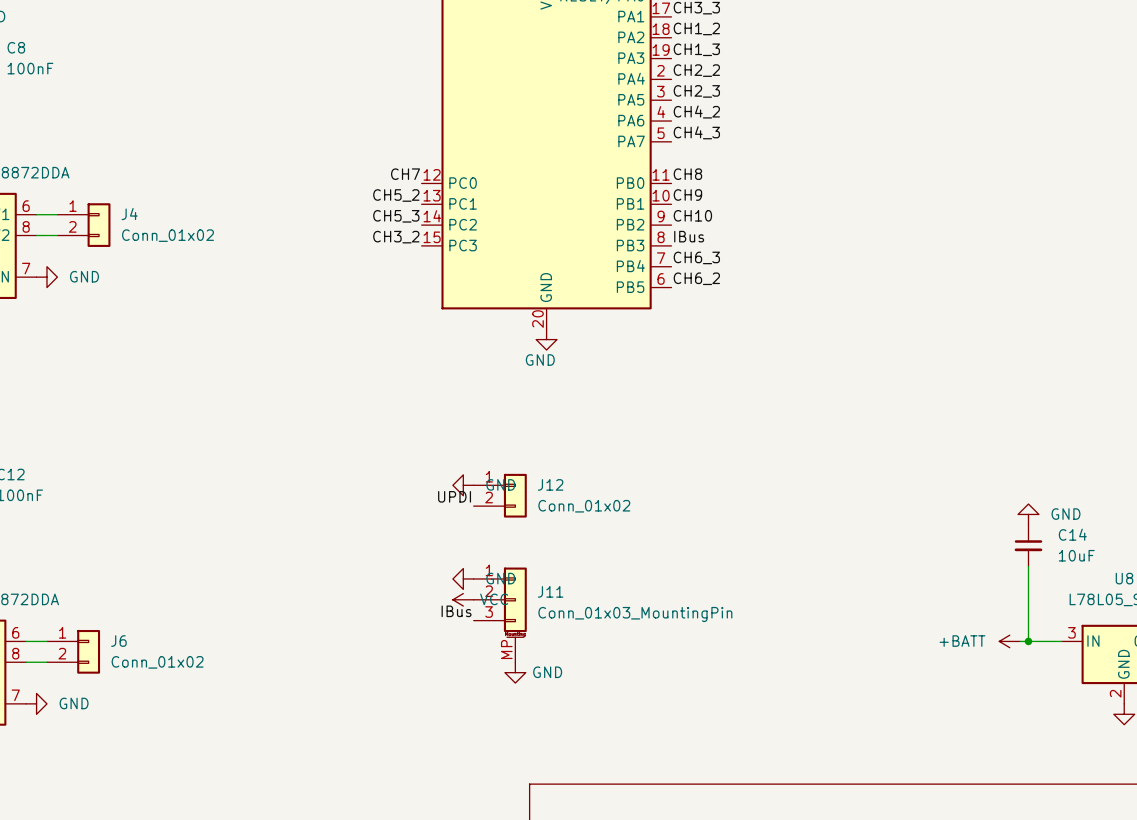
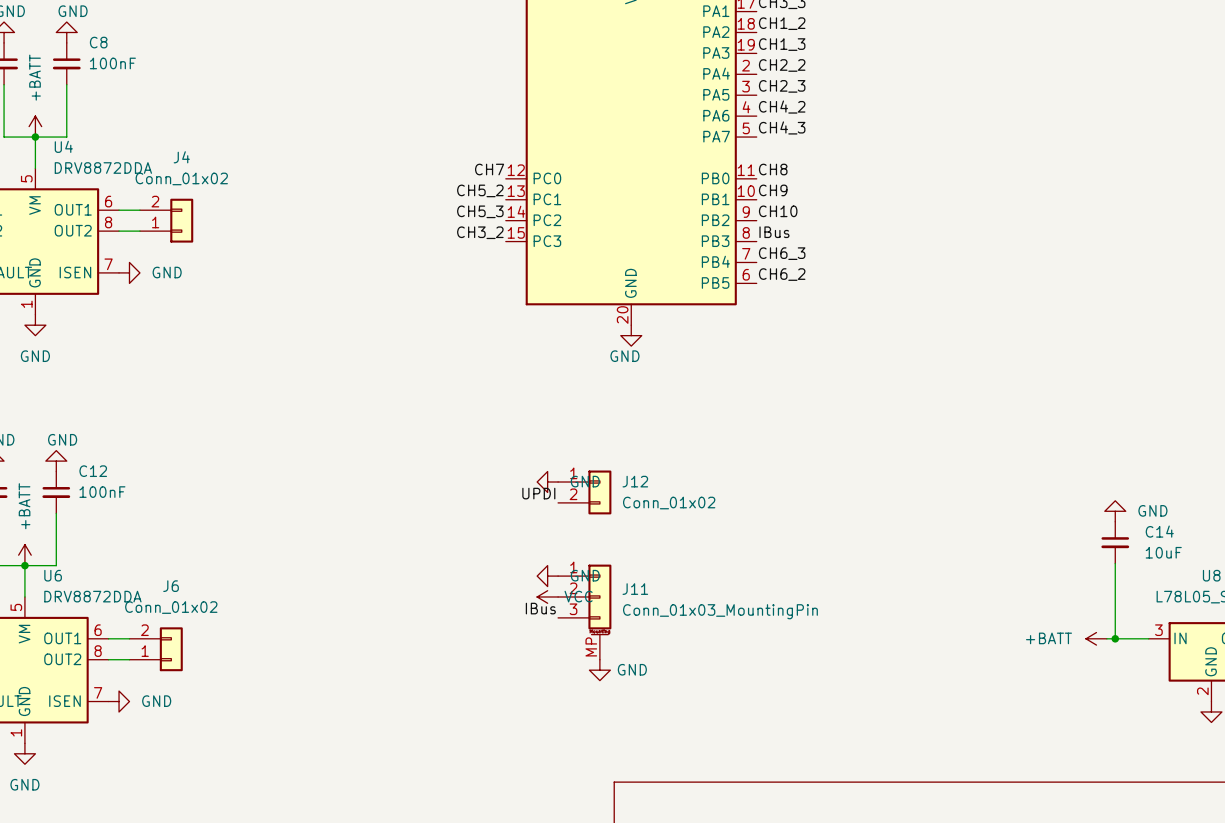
J4 name position: J4 (129, 214) -> J4 (181, 157)
J4 flip: as is (99, 225) -> up-down (181, 220)
J4 value position: Conn_01x02 (167, 235) -> Conn_01x02 (181, 178)
J6 name position: J6 (118, 641) -> J6 (171, 586)
J6 flip: as is (88, 651) -> up-down (171, 649)
J6 value position: Conn_01x02 (157, 662) -> Conn_01x02 (171, 607)

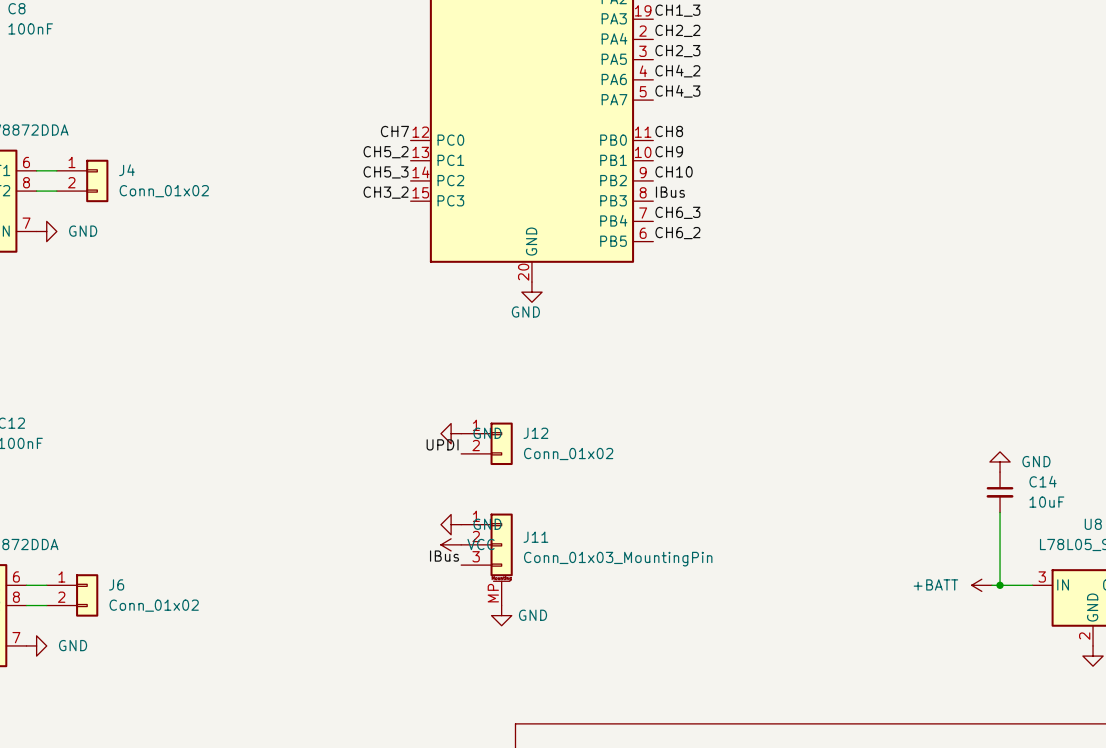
J4 name position: J4 (181, 157) -> J4 (126, 170)
J4 value position: Conn_01x02 (181, 178) -> Conn_01x02 (164, 191)
J4 flip: as is (181, 220) -> up-down (97, 180)
J6 name position: J6 (171, 586) -> J6 (116, 584)
J6 value position: Conn_01x02 (171, 607) -> Conn_01x02 (154, 605)
J6 flip: as is (171, 649) -> up-down (87, 595)

